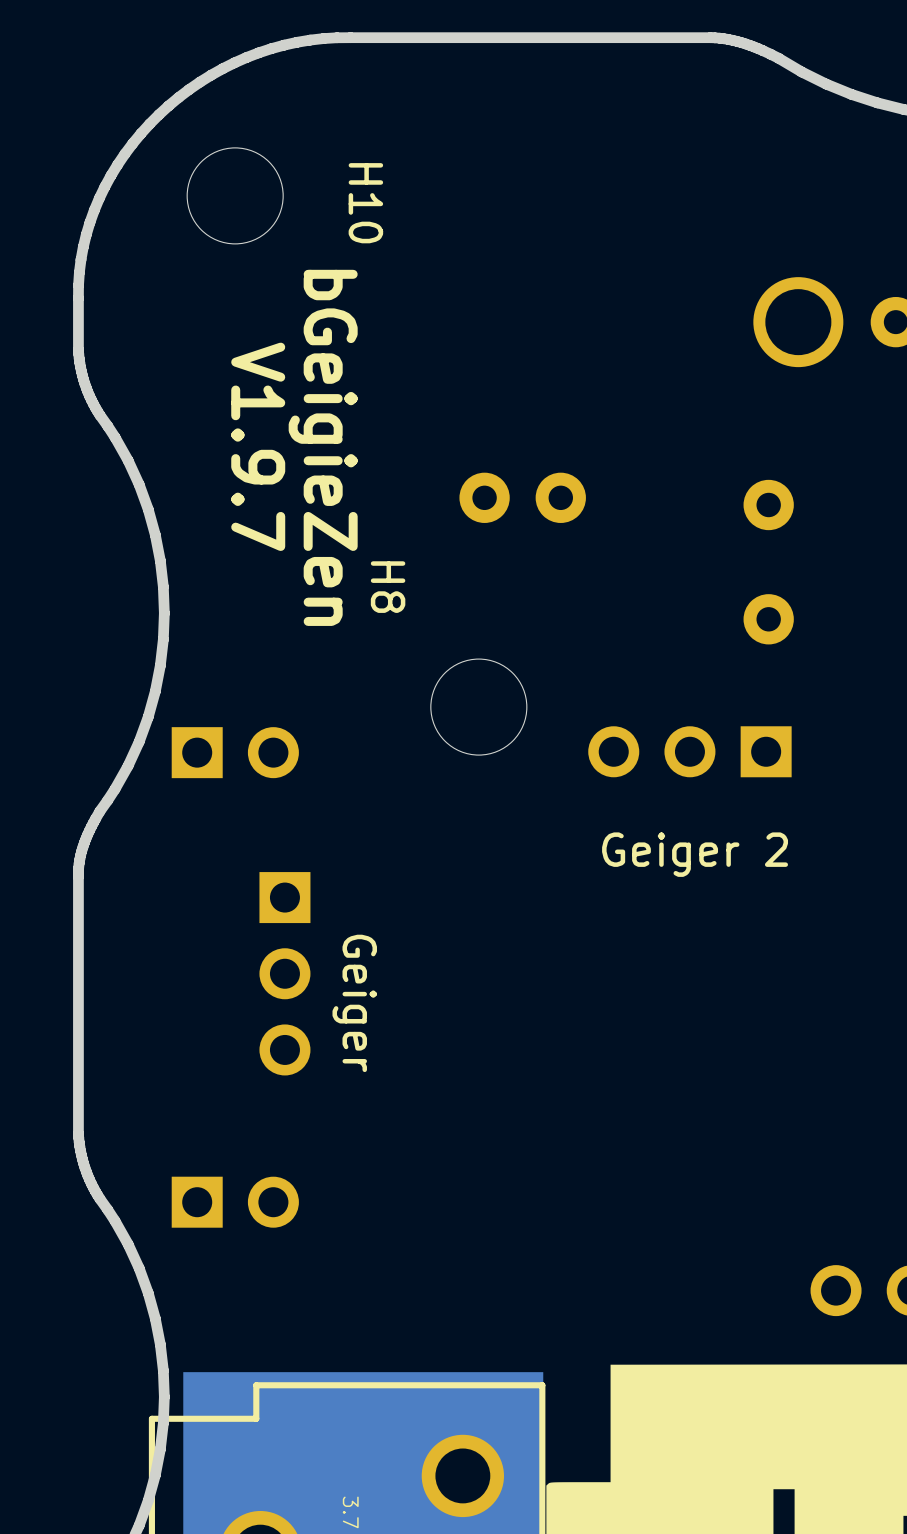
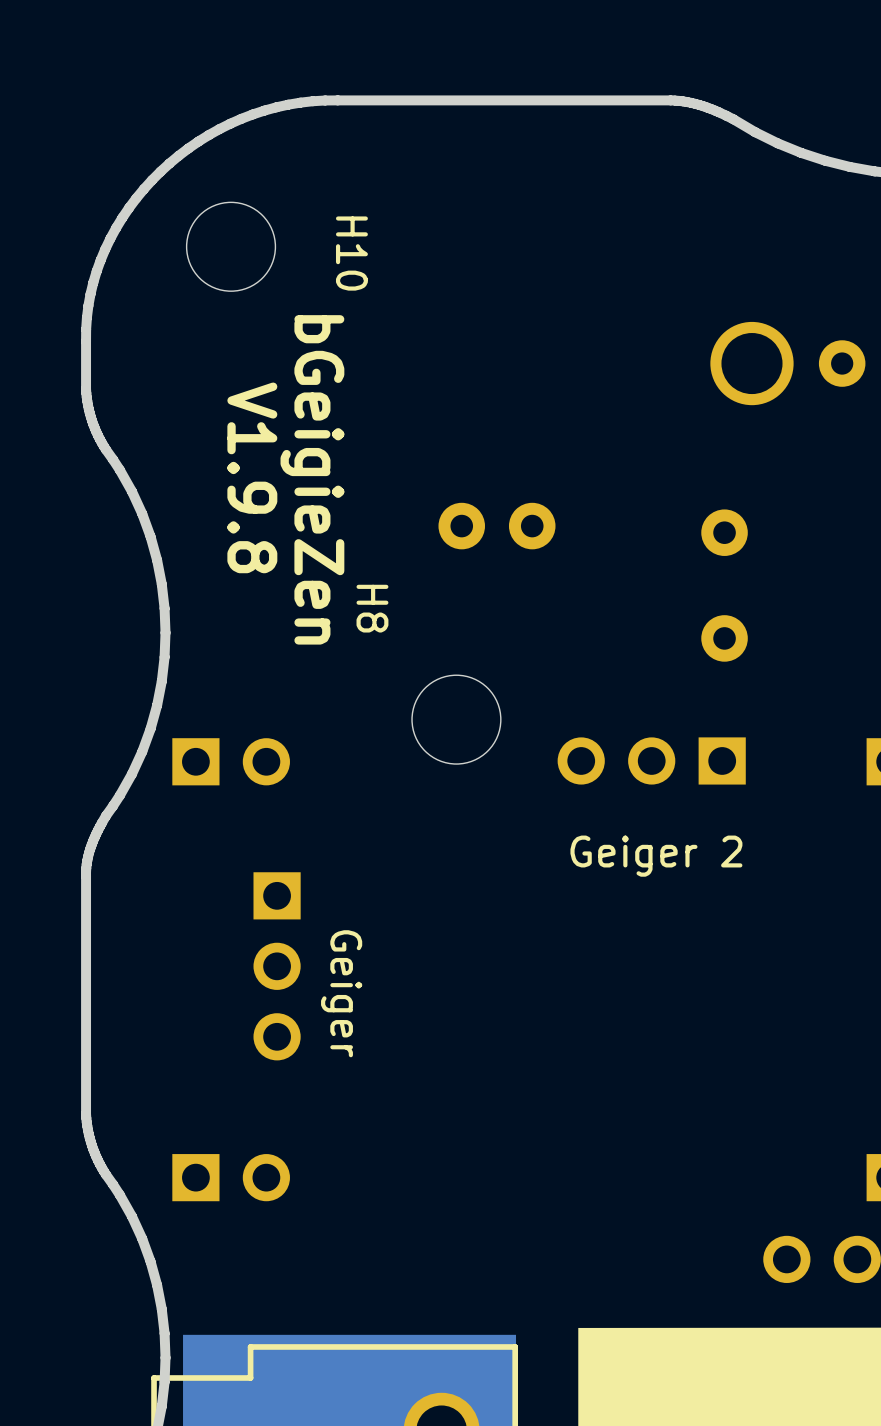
text: V1.9.7 (258, 446) -> V1.9.8 (252, 477)

